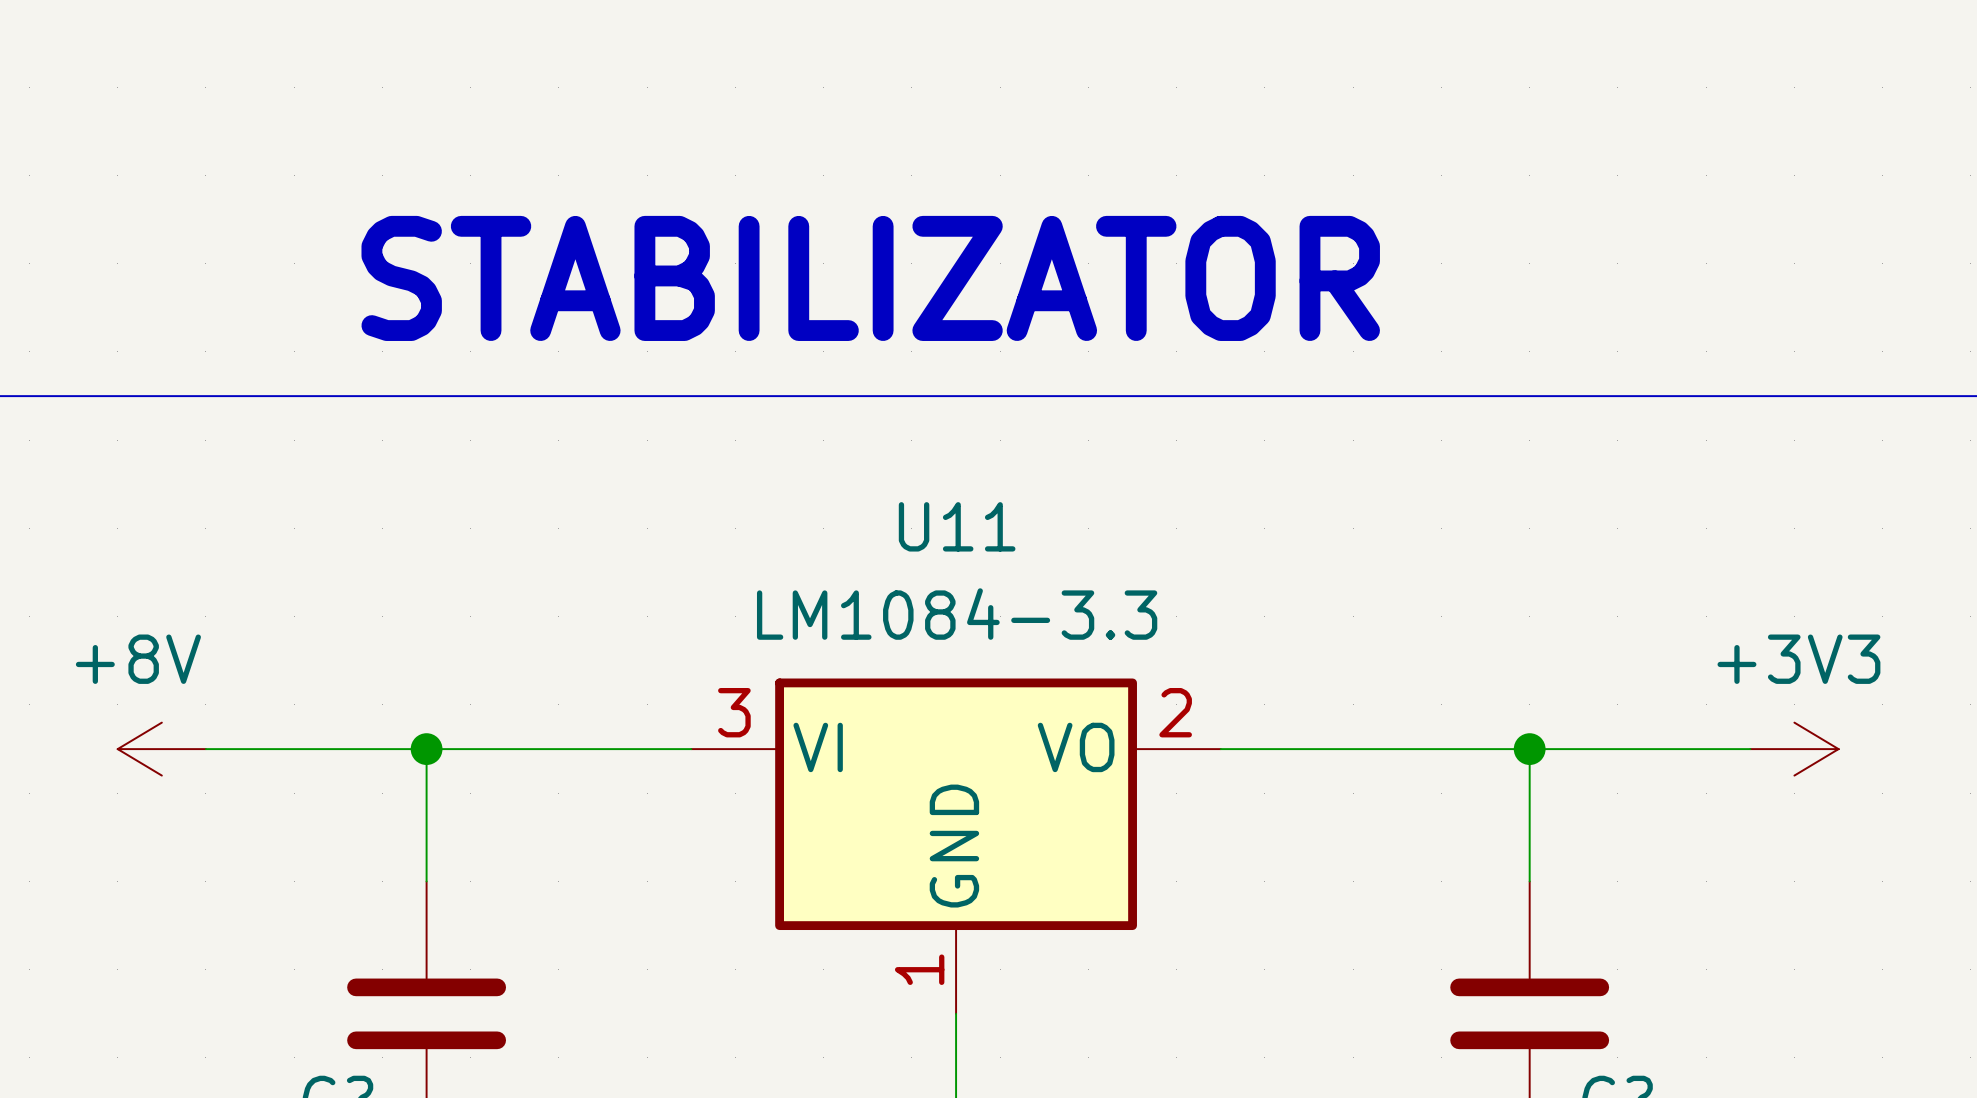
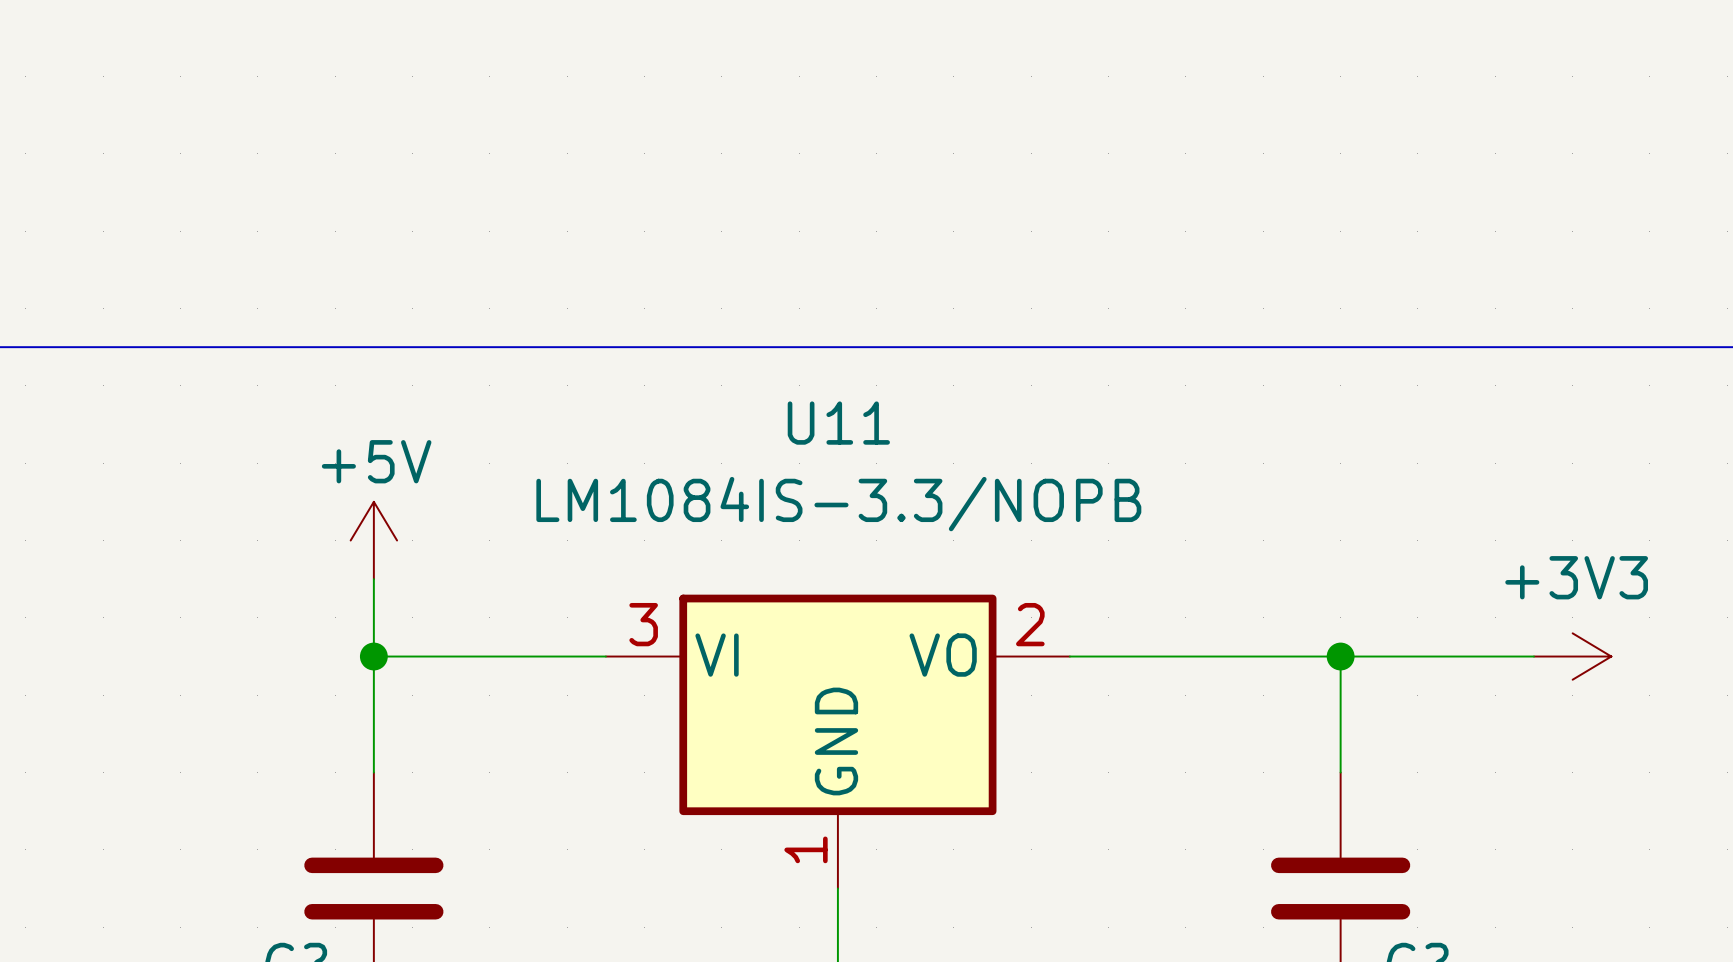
text: STABILIZATOR (870, 278) -> none
U11 name position: U11 (957, 526) -> U11 (838, 423)
U11 value: LM1084-3.3 (957, 614) -> LM1084IS-3.3/NOPB (838, 504)
power symbol: none -> +5V (373, 540)
power symbol: +8V (161, 749) -> none
wire: (205, 749) (426, 749) -> (373, 579) (373, 656)

